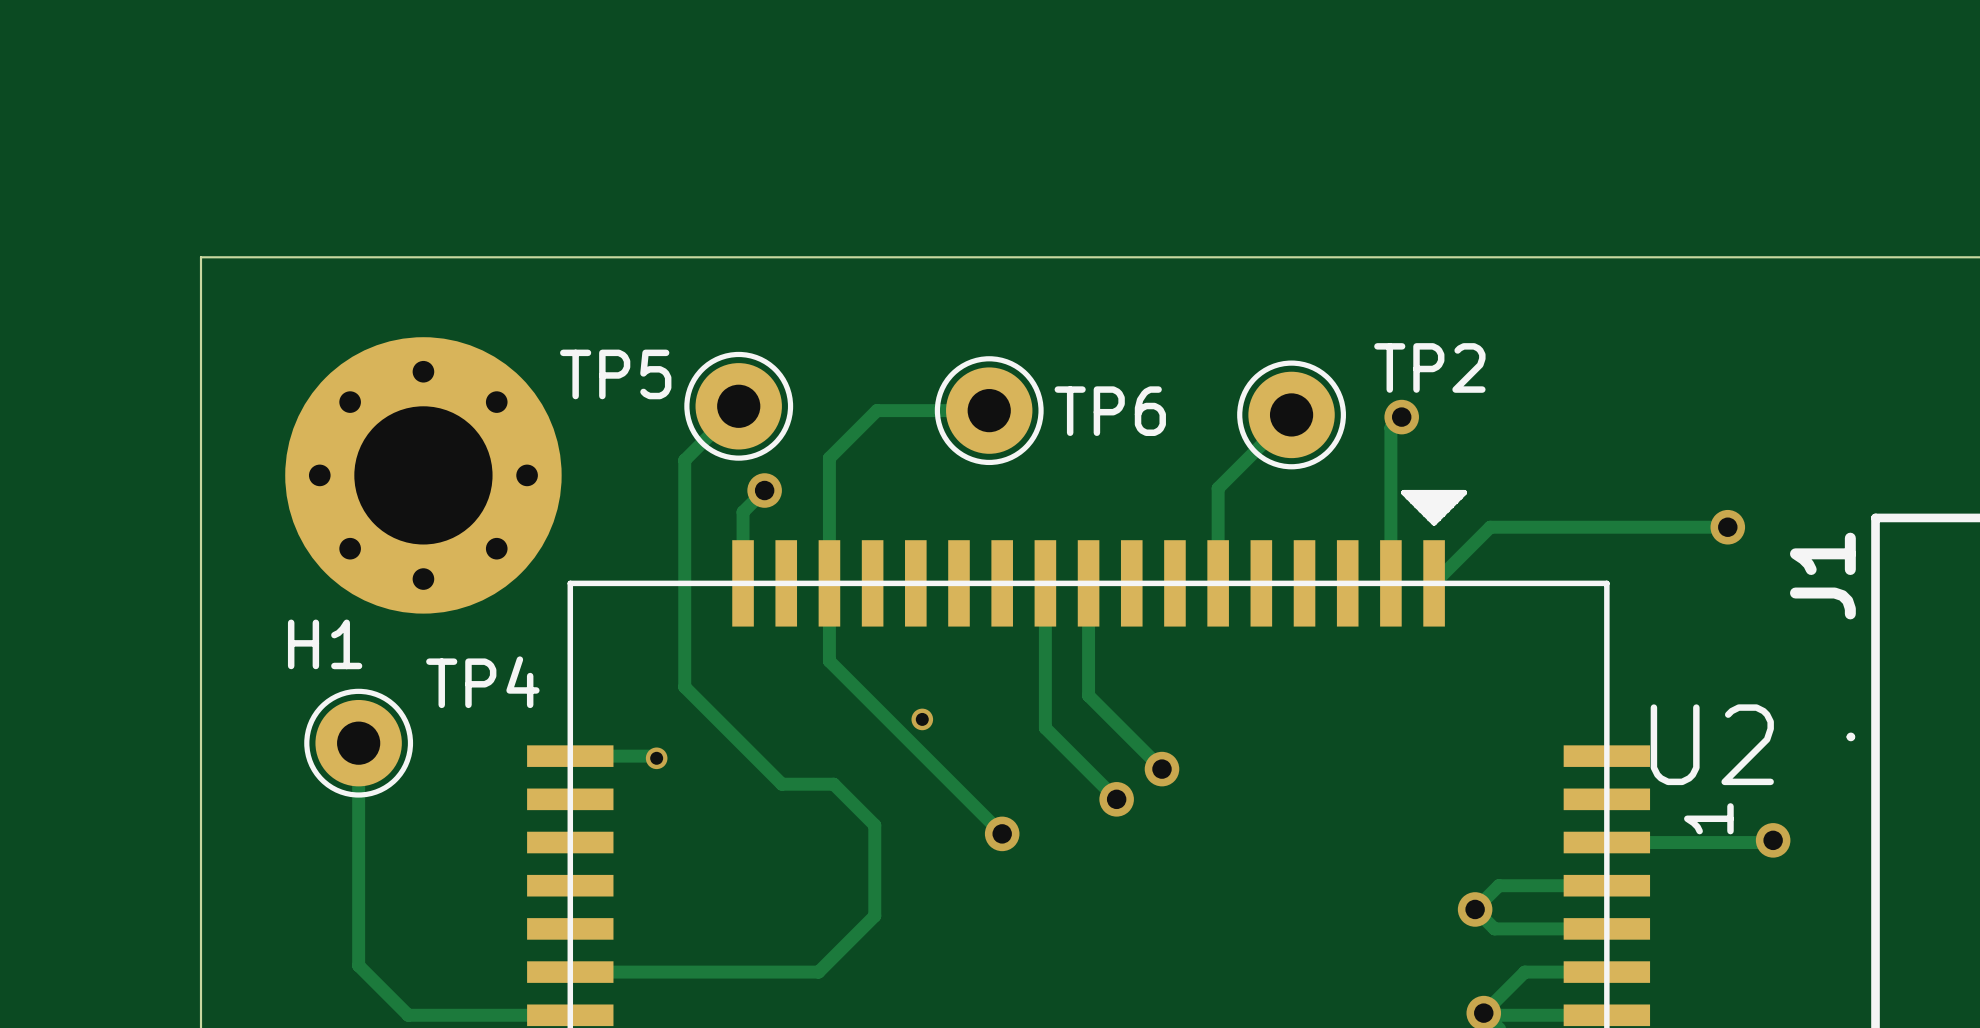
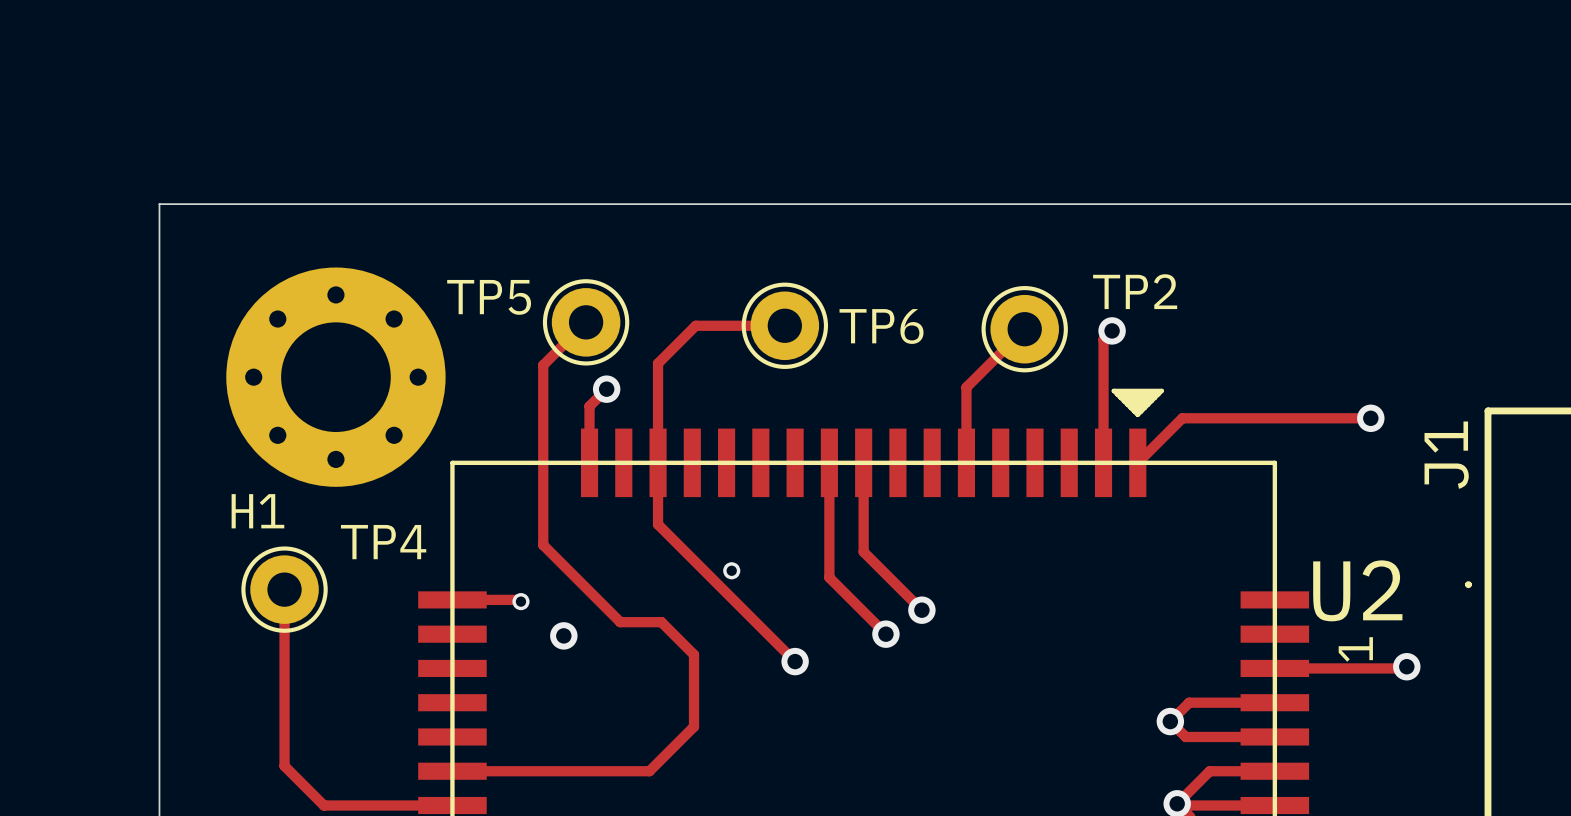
via: none -> (563, 635)

